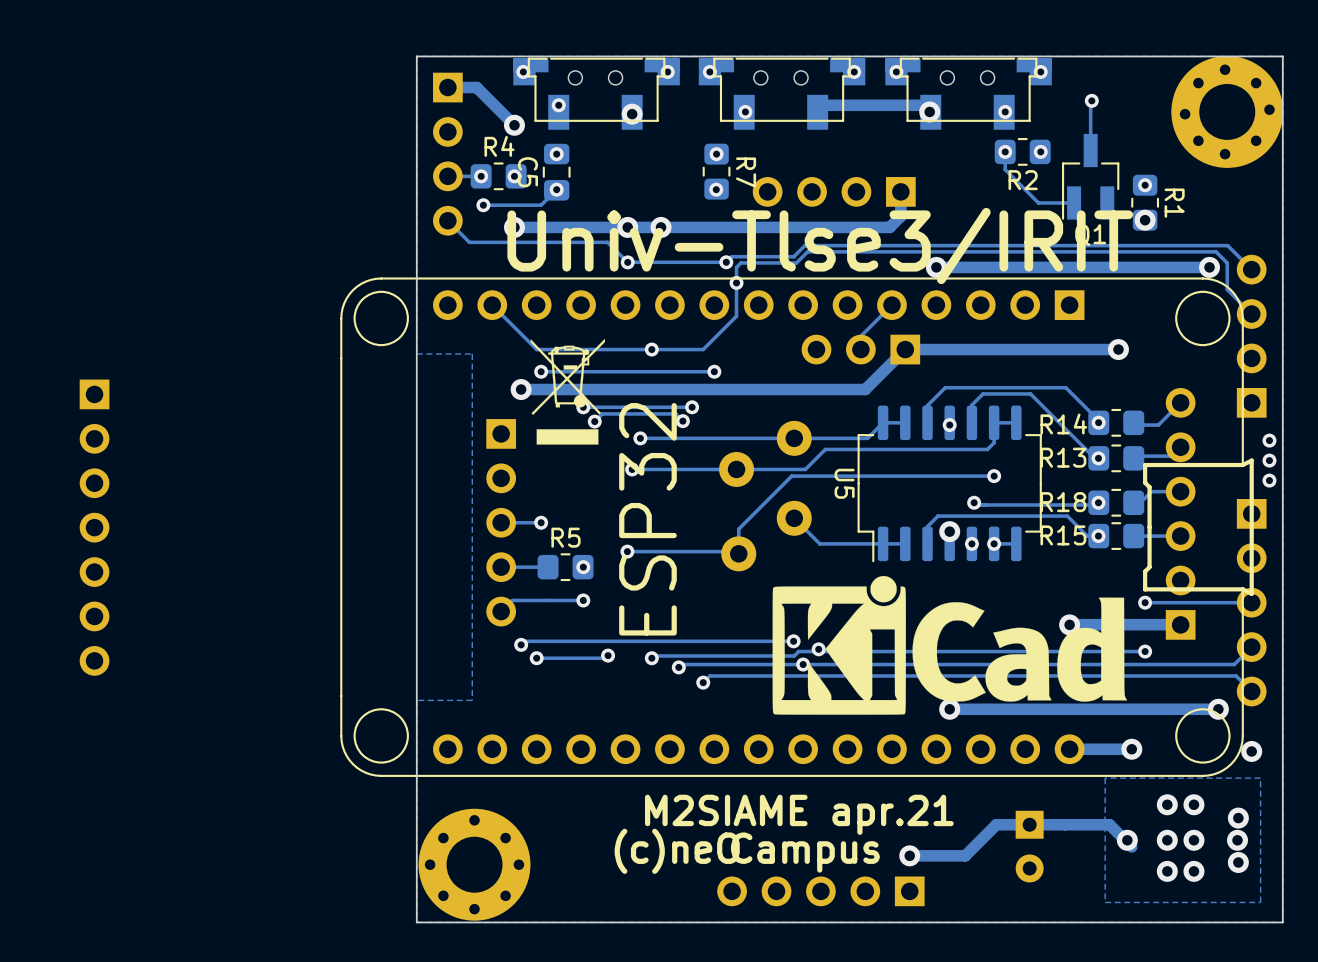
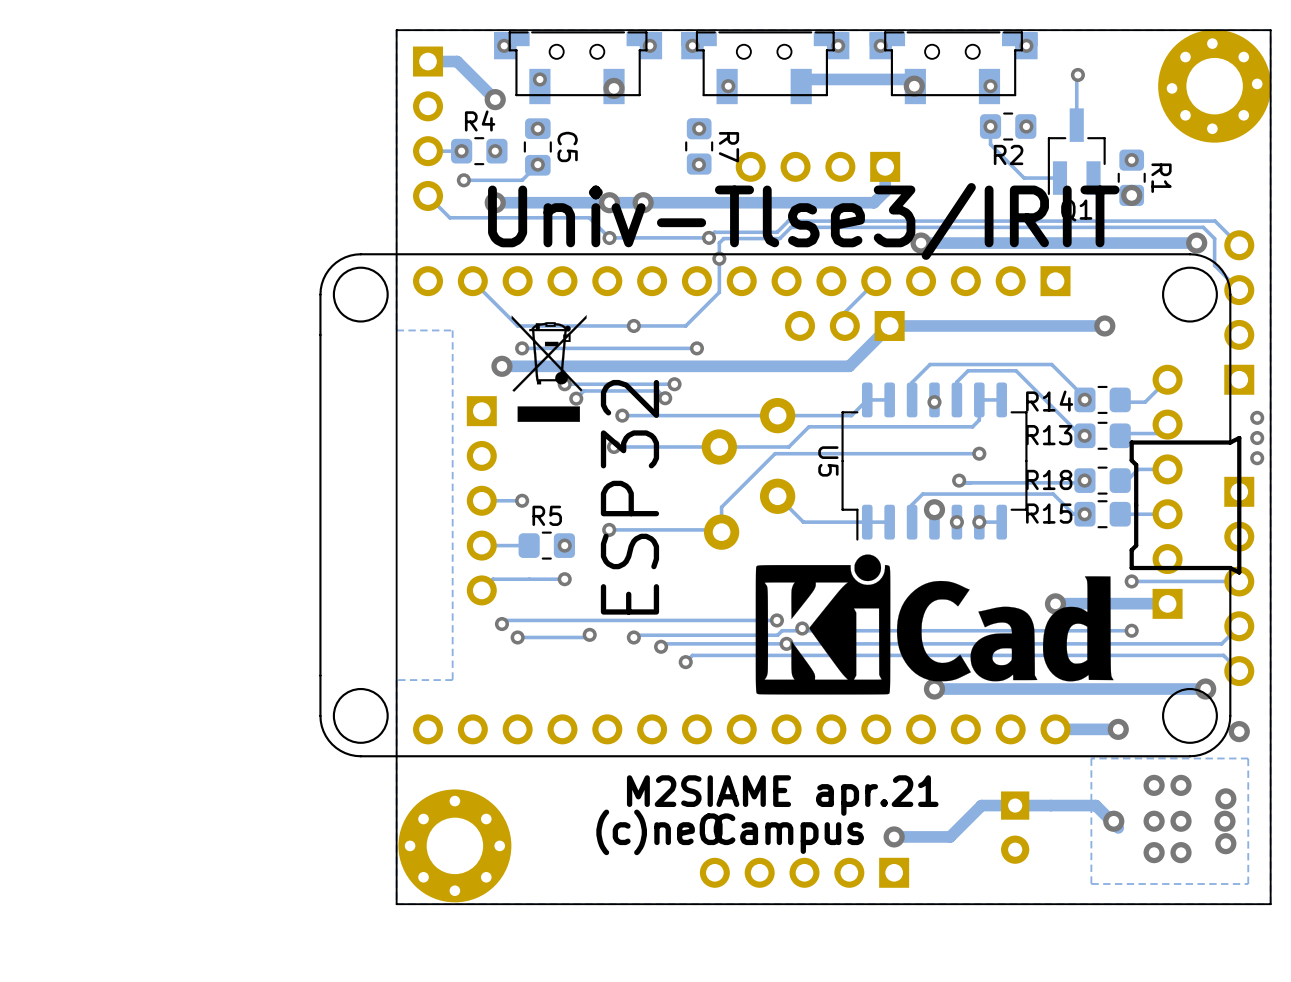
C5 name position: C5 (527, 172) -> C5 (567, 146)
part: (94, 527) -> none

